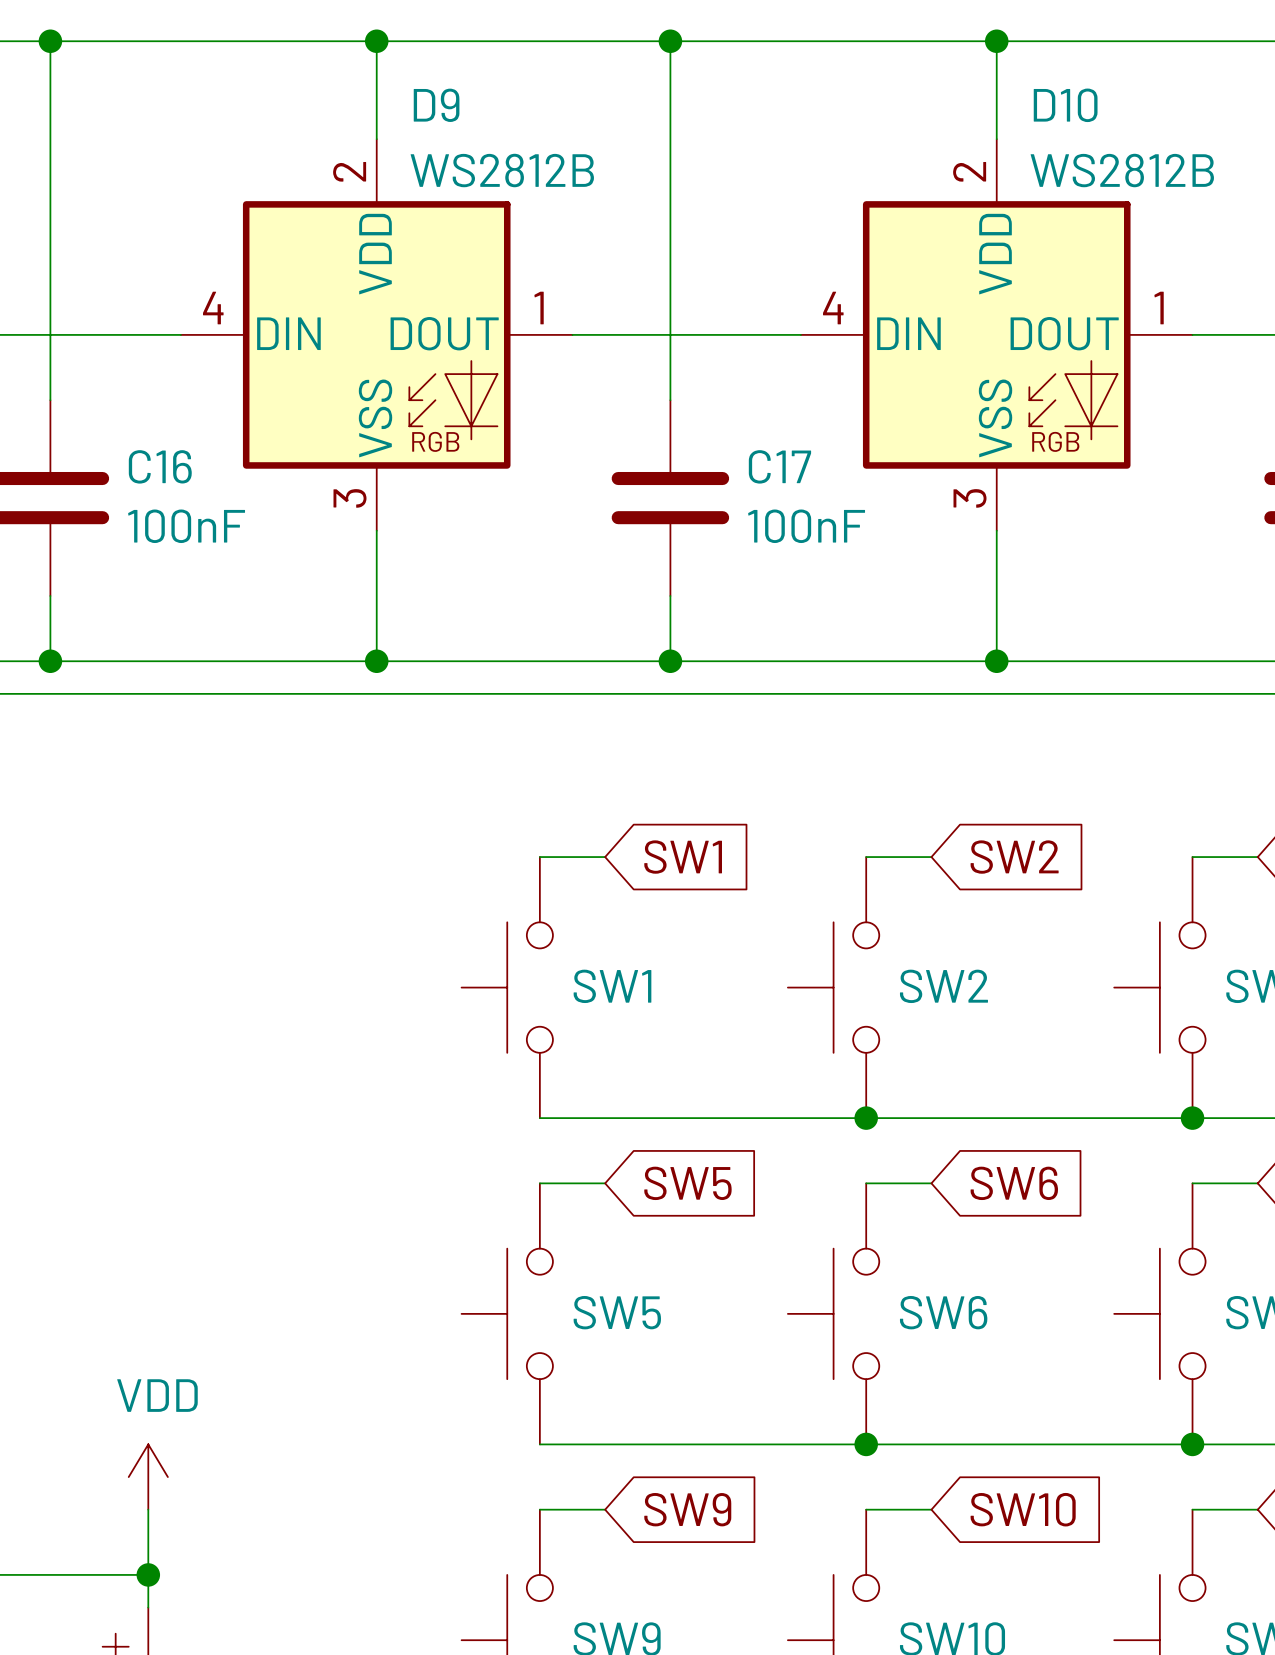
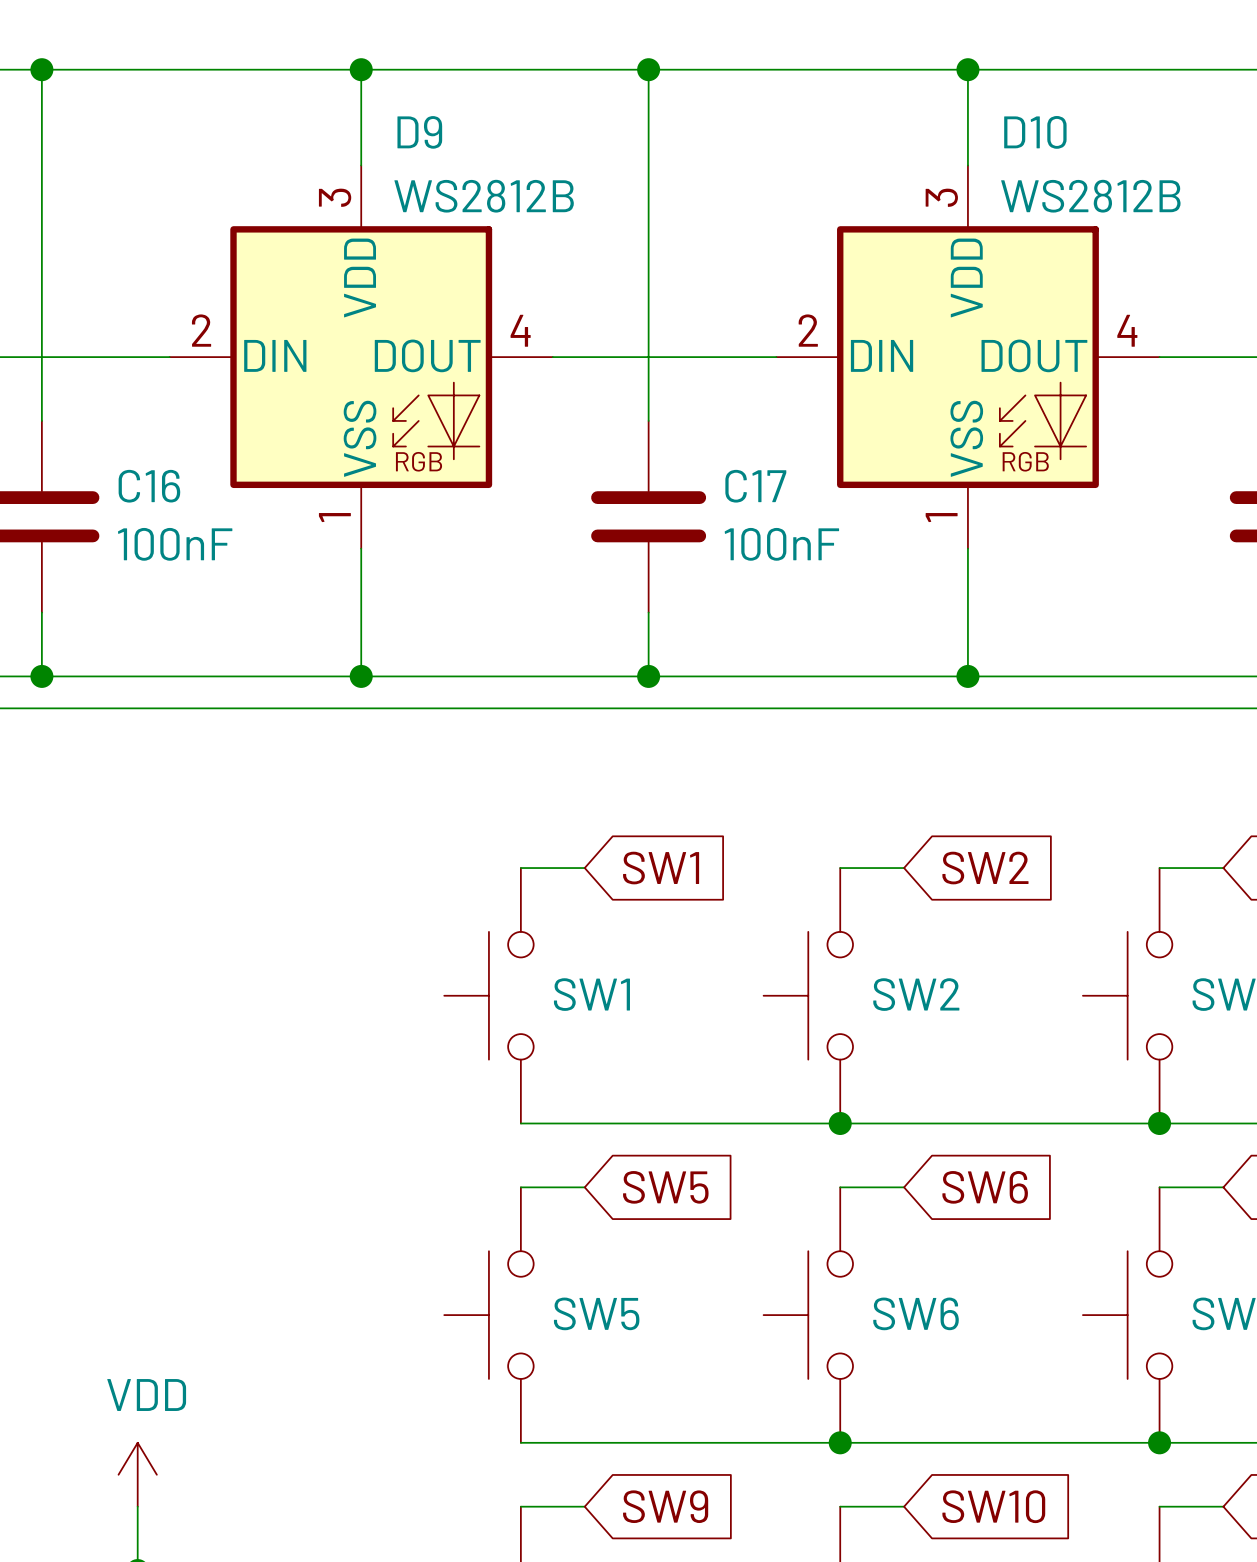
D9 pin number: 2 (349, 171) -> 3 (335, 197)
D10 pin number: 2 (969, 171) -> 3 (941, 197)
D9 pin number: 4 (213, 308) -> 2 (201, 330)
D9 pin number: 1 (539, 308) -> 4 (520, 330)
D10 pin number: 4 (833, 308) -> 2 (808, 330)
D10 pin number: 1 (1159, 308) -> 4 (1127, 330)
D9 pin number: 3 (349, 498) -> 1 (334, 517)
D10 pin number: 3 (970, 498) -> 1 (941, 517)

